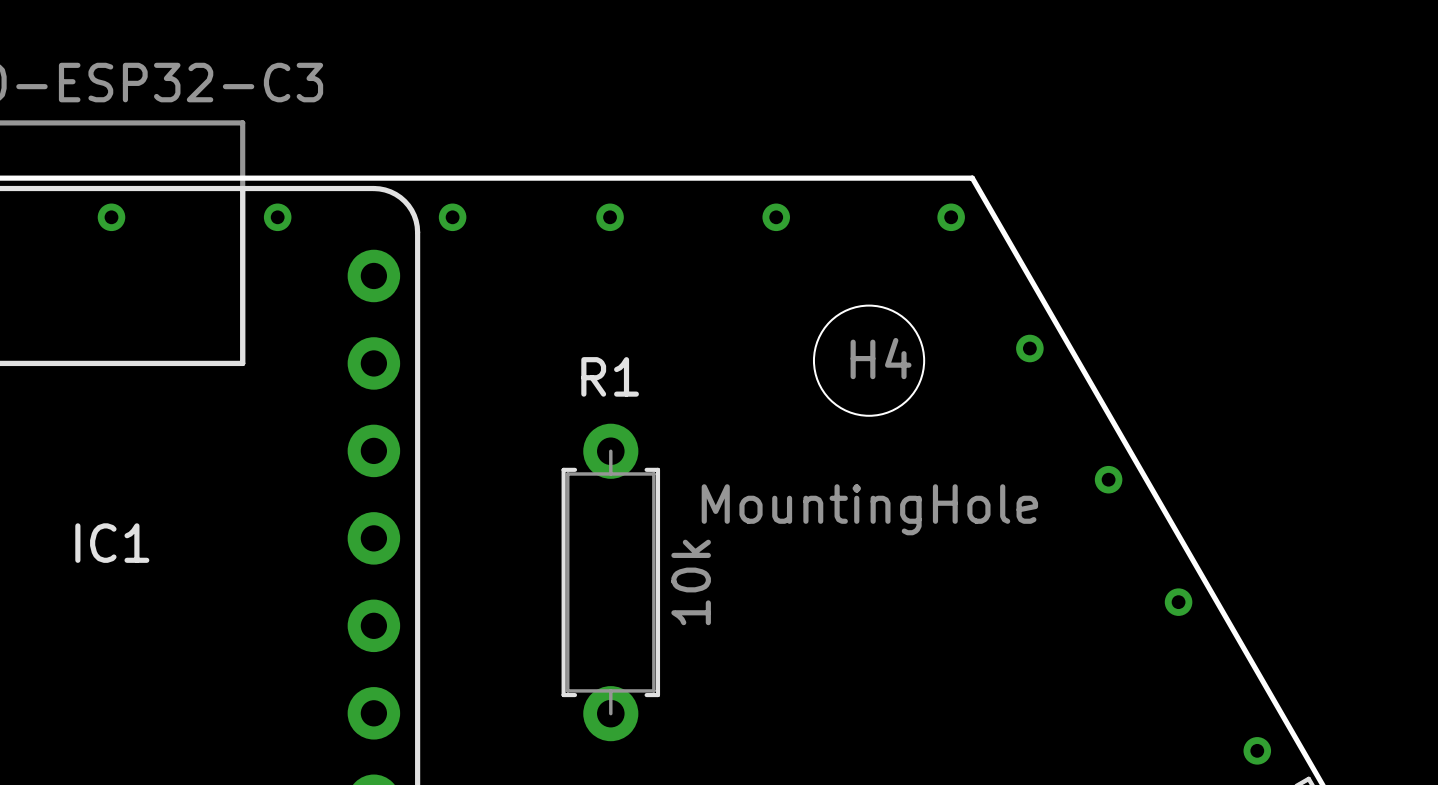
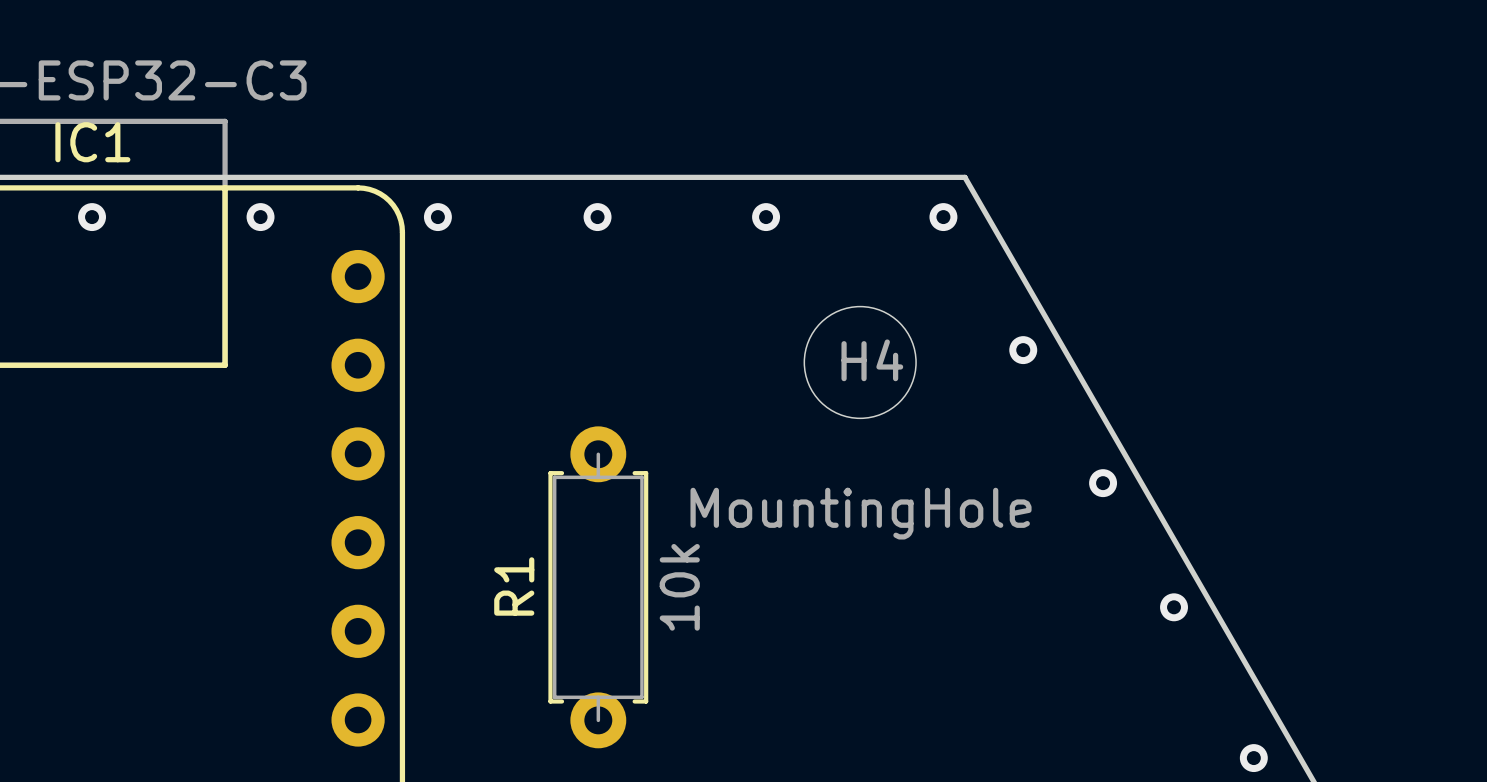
R1 name rotation: 0° (610, 376) -> 90° counterclockwise (514, 586)
R1 name position: R1 (610, 376) -> R1 (514, 586)
IC1 name position: IC1 (112, 543) -> IC1 (92, 142)

